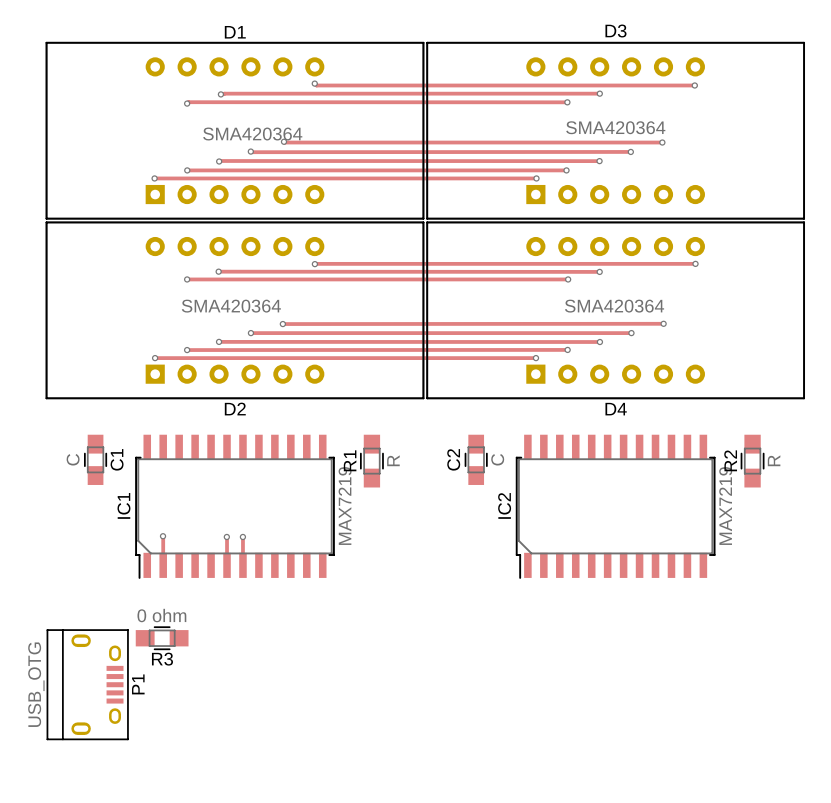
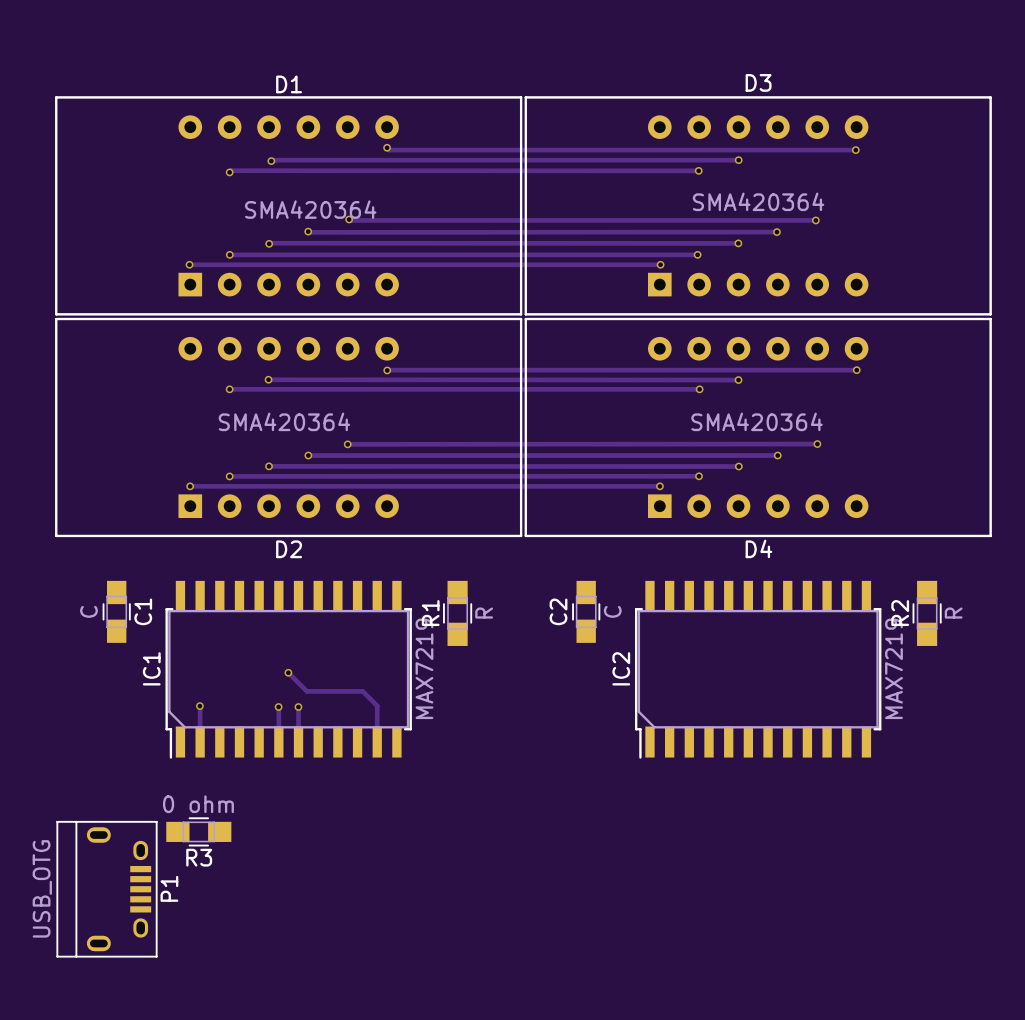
track: none -> (288, 672) (306, 691) (362, 691) (377, 705) (377, 742)
via: none -> (288, 672)

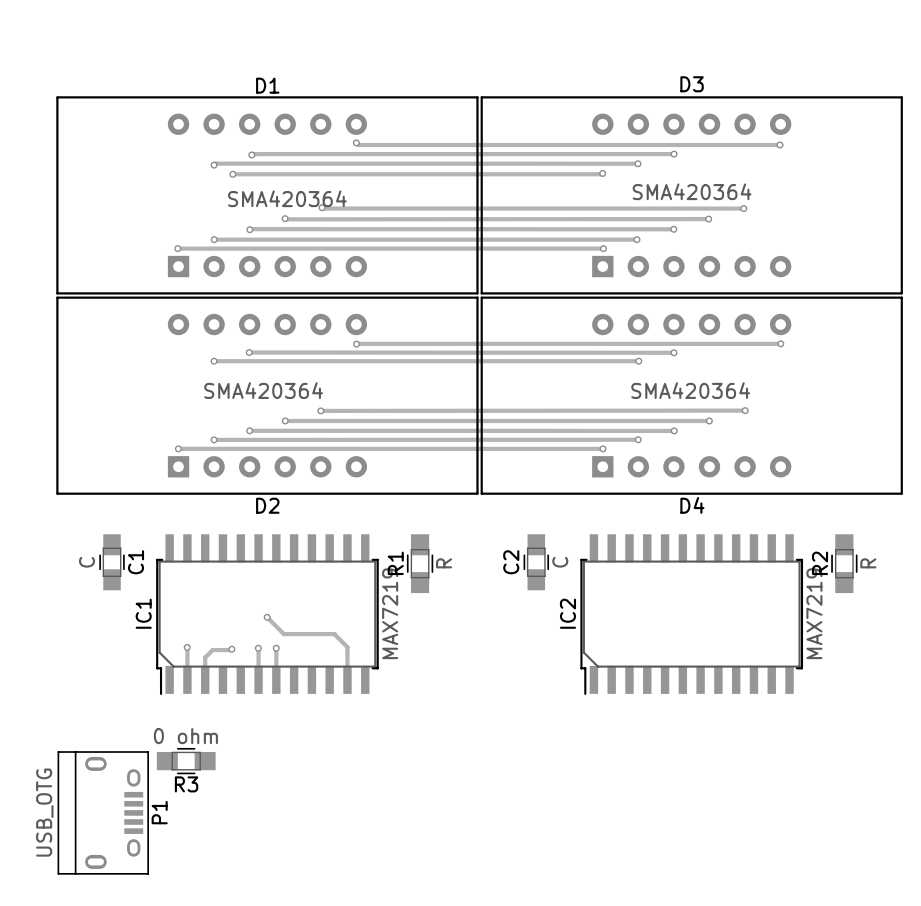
track: none -> (602, 173) (232, 174)
via: none -> (602, 173)
via: none -> (232, 174)
track: none -> (231, 649) (212, 650) (205, 657) (205, 679)
via: none -> (231, 649)

